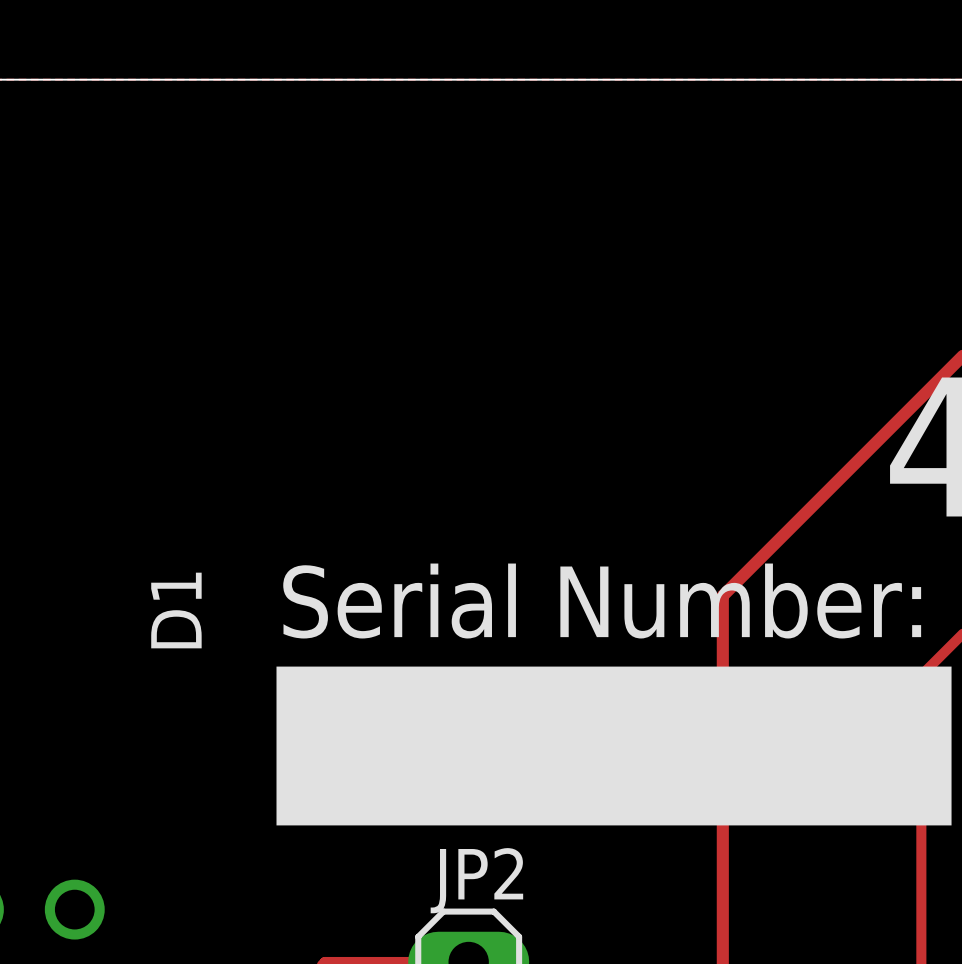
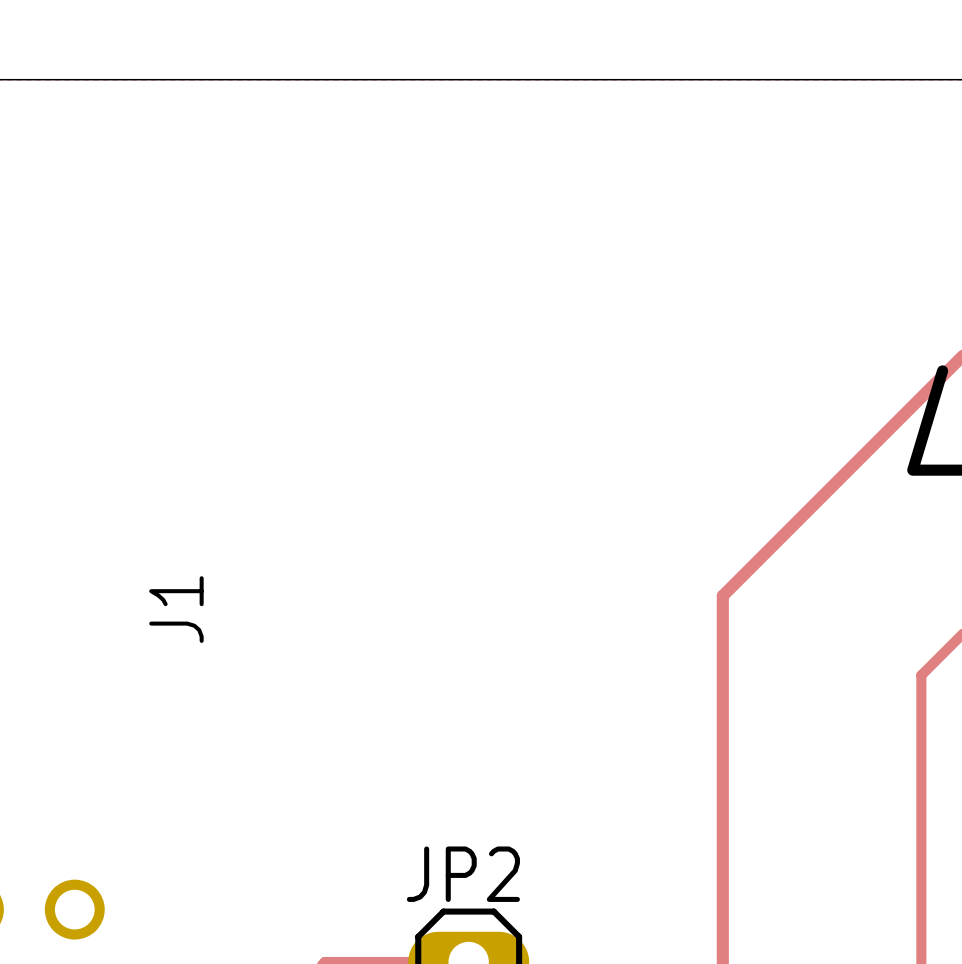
text: Serial Number: (602, 601) -> none
D1 name: D1 (176, 610) -> J1 (176, 609)
drawing: [276, 666, 952, 826] -> none

